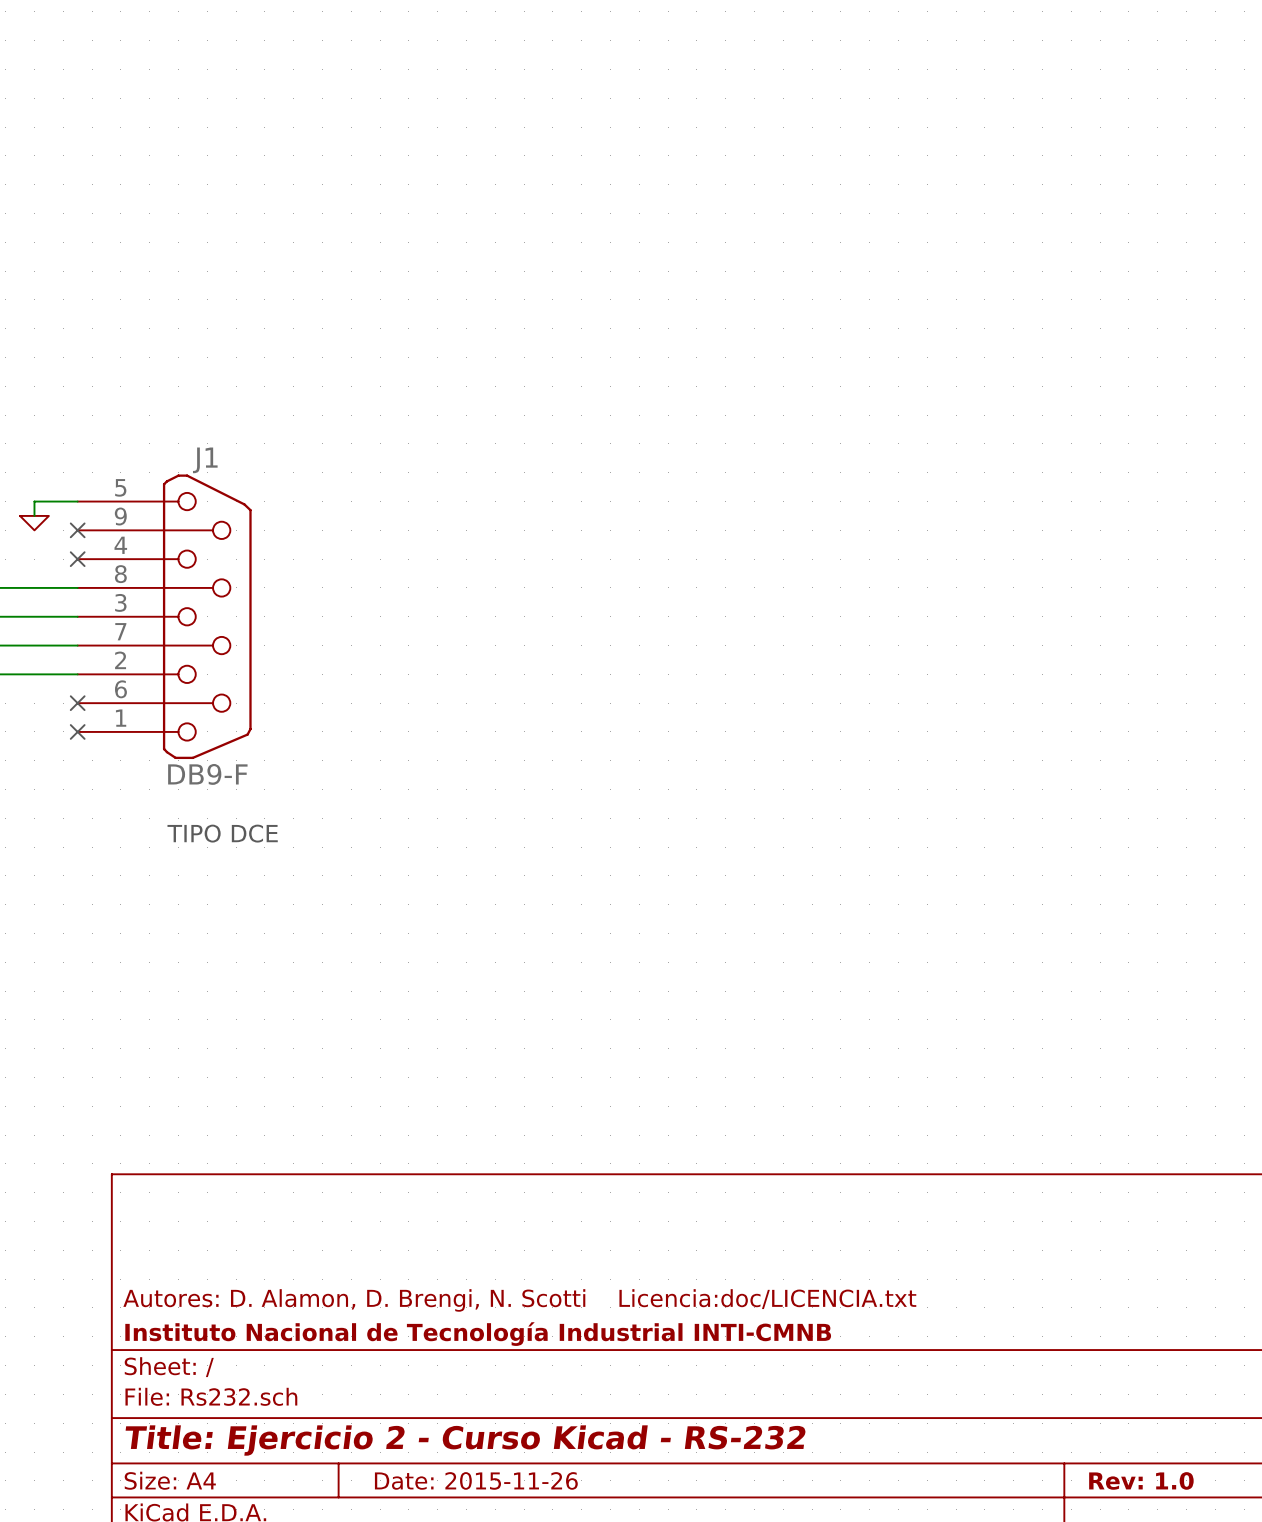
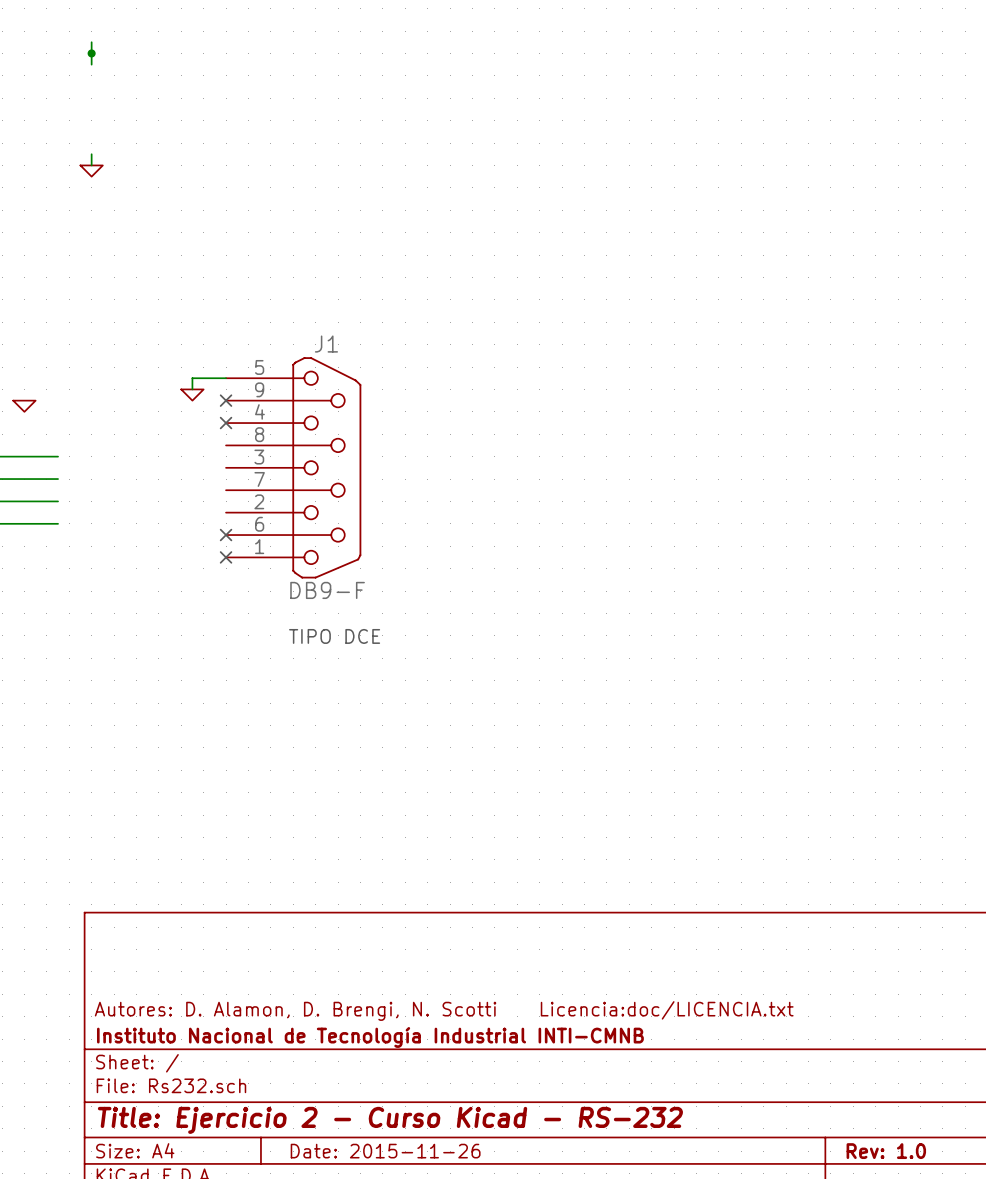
wire: none -> (91, 42) (91, 64)
junction: none -> (91, 53)
wire: none -> (91, 154) (91, 165)
power symbol: none -> (91, 171)
wire: (77, 501) (34, 501) (34, 515) -> (226, 378) (192, 378) (192, 389)
power symbol: none -> (192, 395)
no-connect mark: none -> (226, 400)
no-connect mark: (77, 530) -> none
no-connect mark: none -> (226, 423)
no-connect mark: (77, 559) -> none
J1 position: (164, 616) -> (293, 467)
no-connect mark: none -> (226, 535)
no-connect mark: (77, 703) -> none
no-connect mark: none -> (226, 557)
no-connect mark: (77, 731) -> none
text position: TIPO DCE (222, 833) -> TIPO DCE (334, 636)

